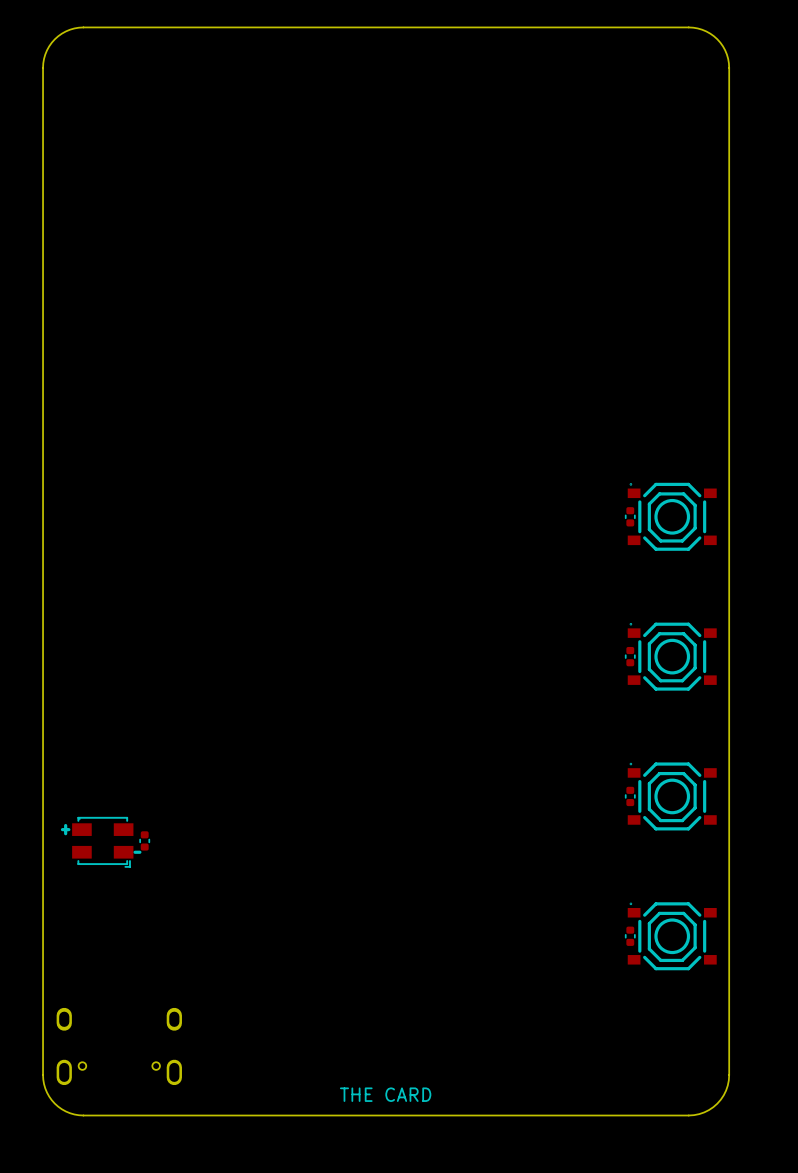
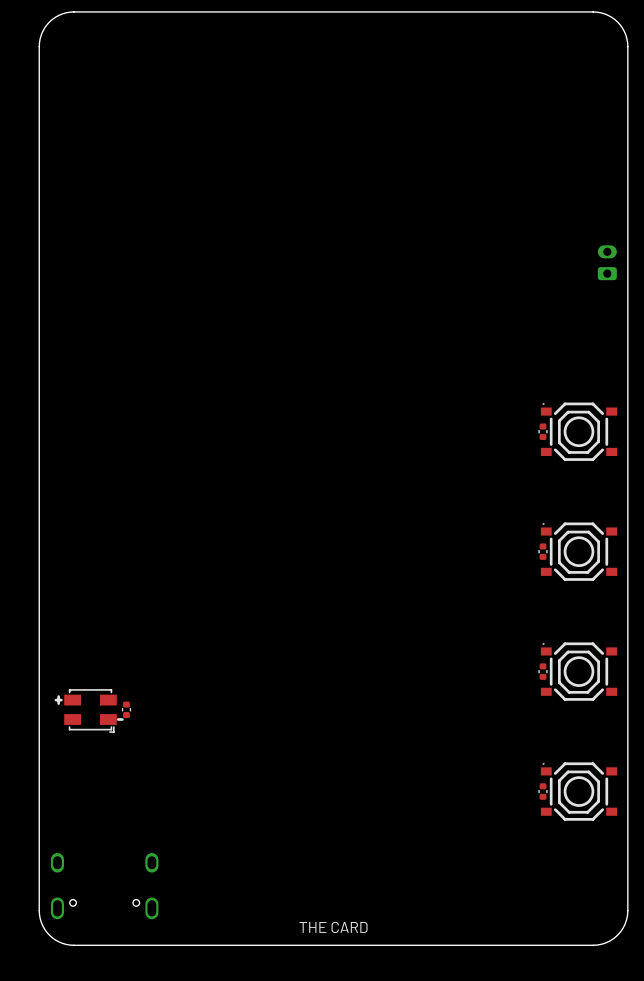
part: none -> (607, 262)

